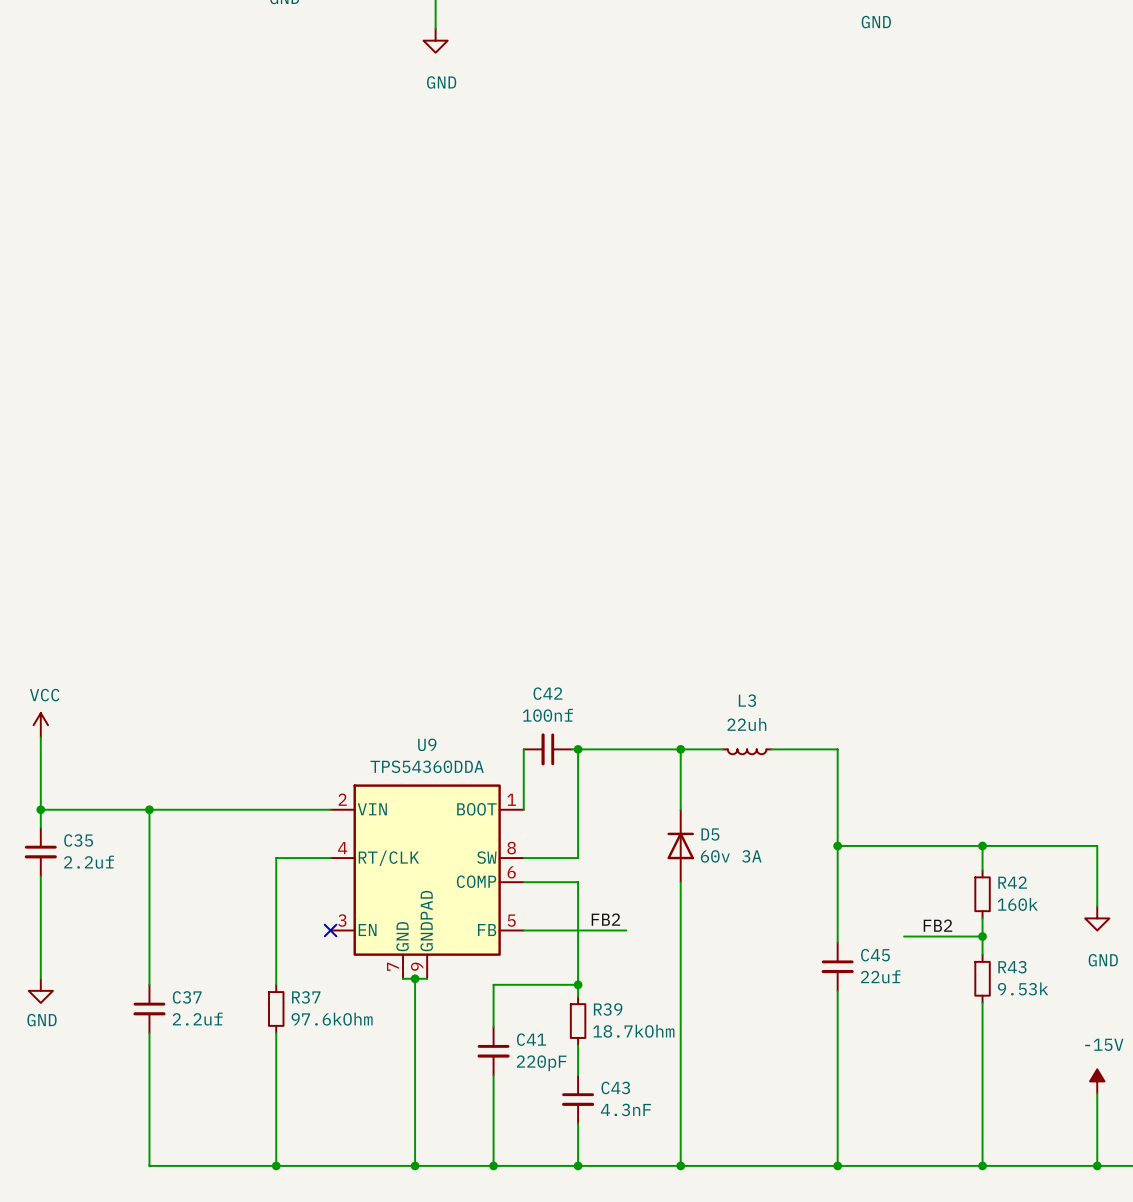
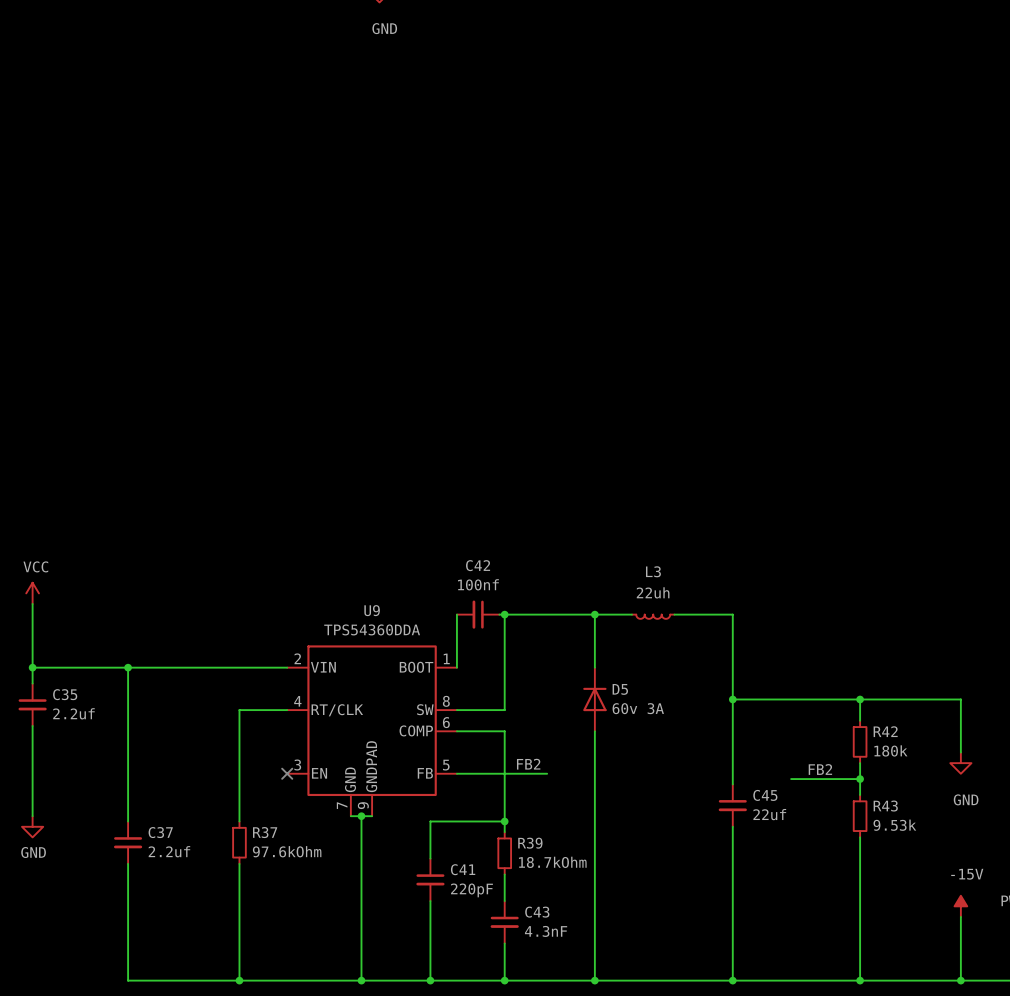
R42 value: 160k (1017, 904) -> 180k (890, 750)

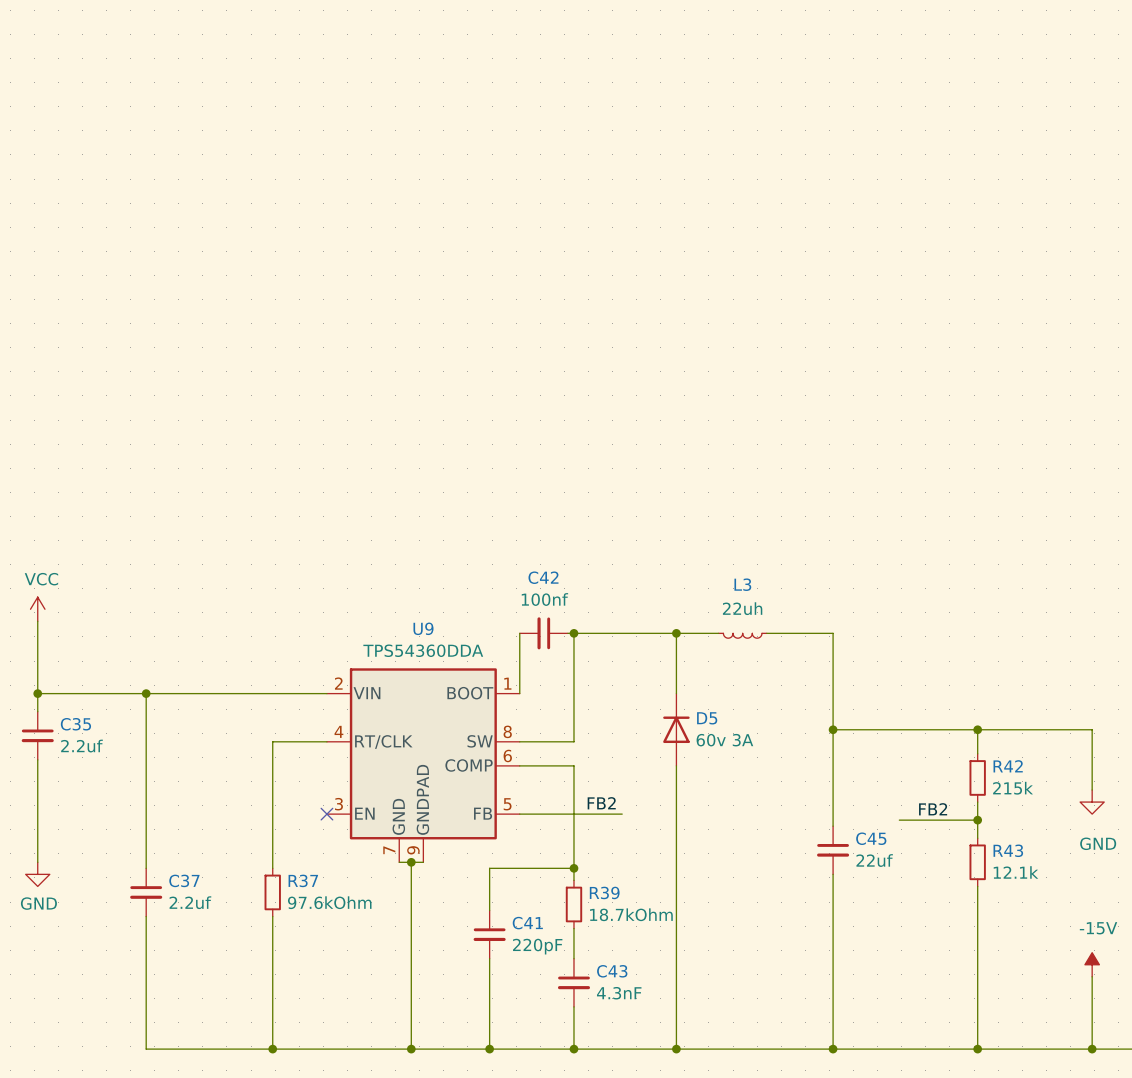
R42 value: 180k (890, 750) -> 215k (1013, 788)
R43 value: 9.53k (894, 825) -> 12.1k (1015, 872)

